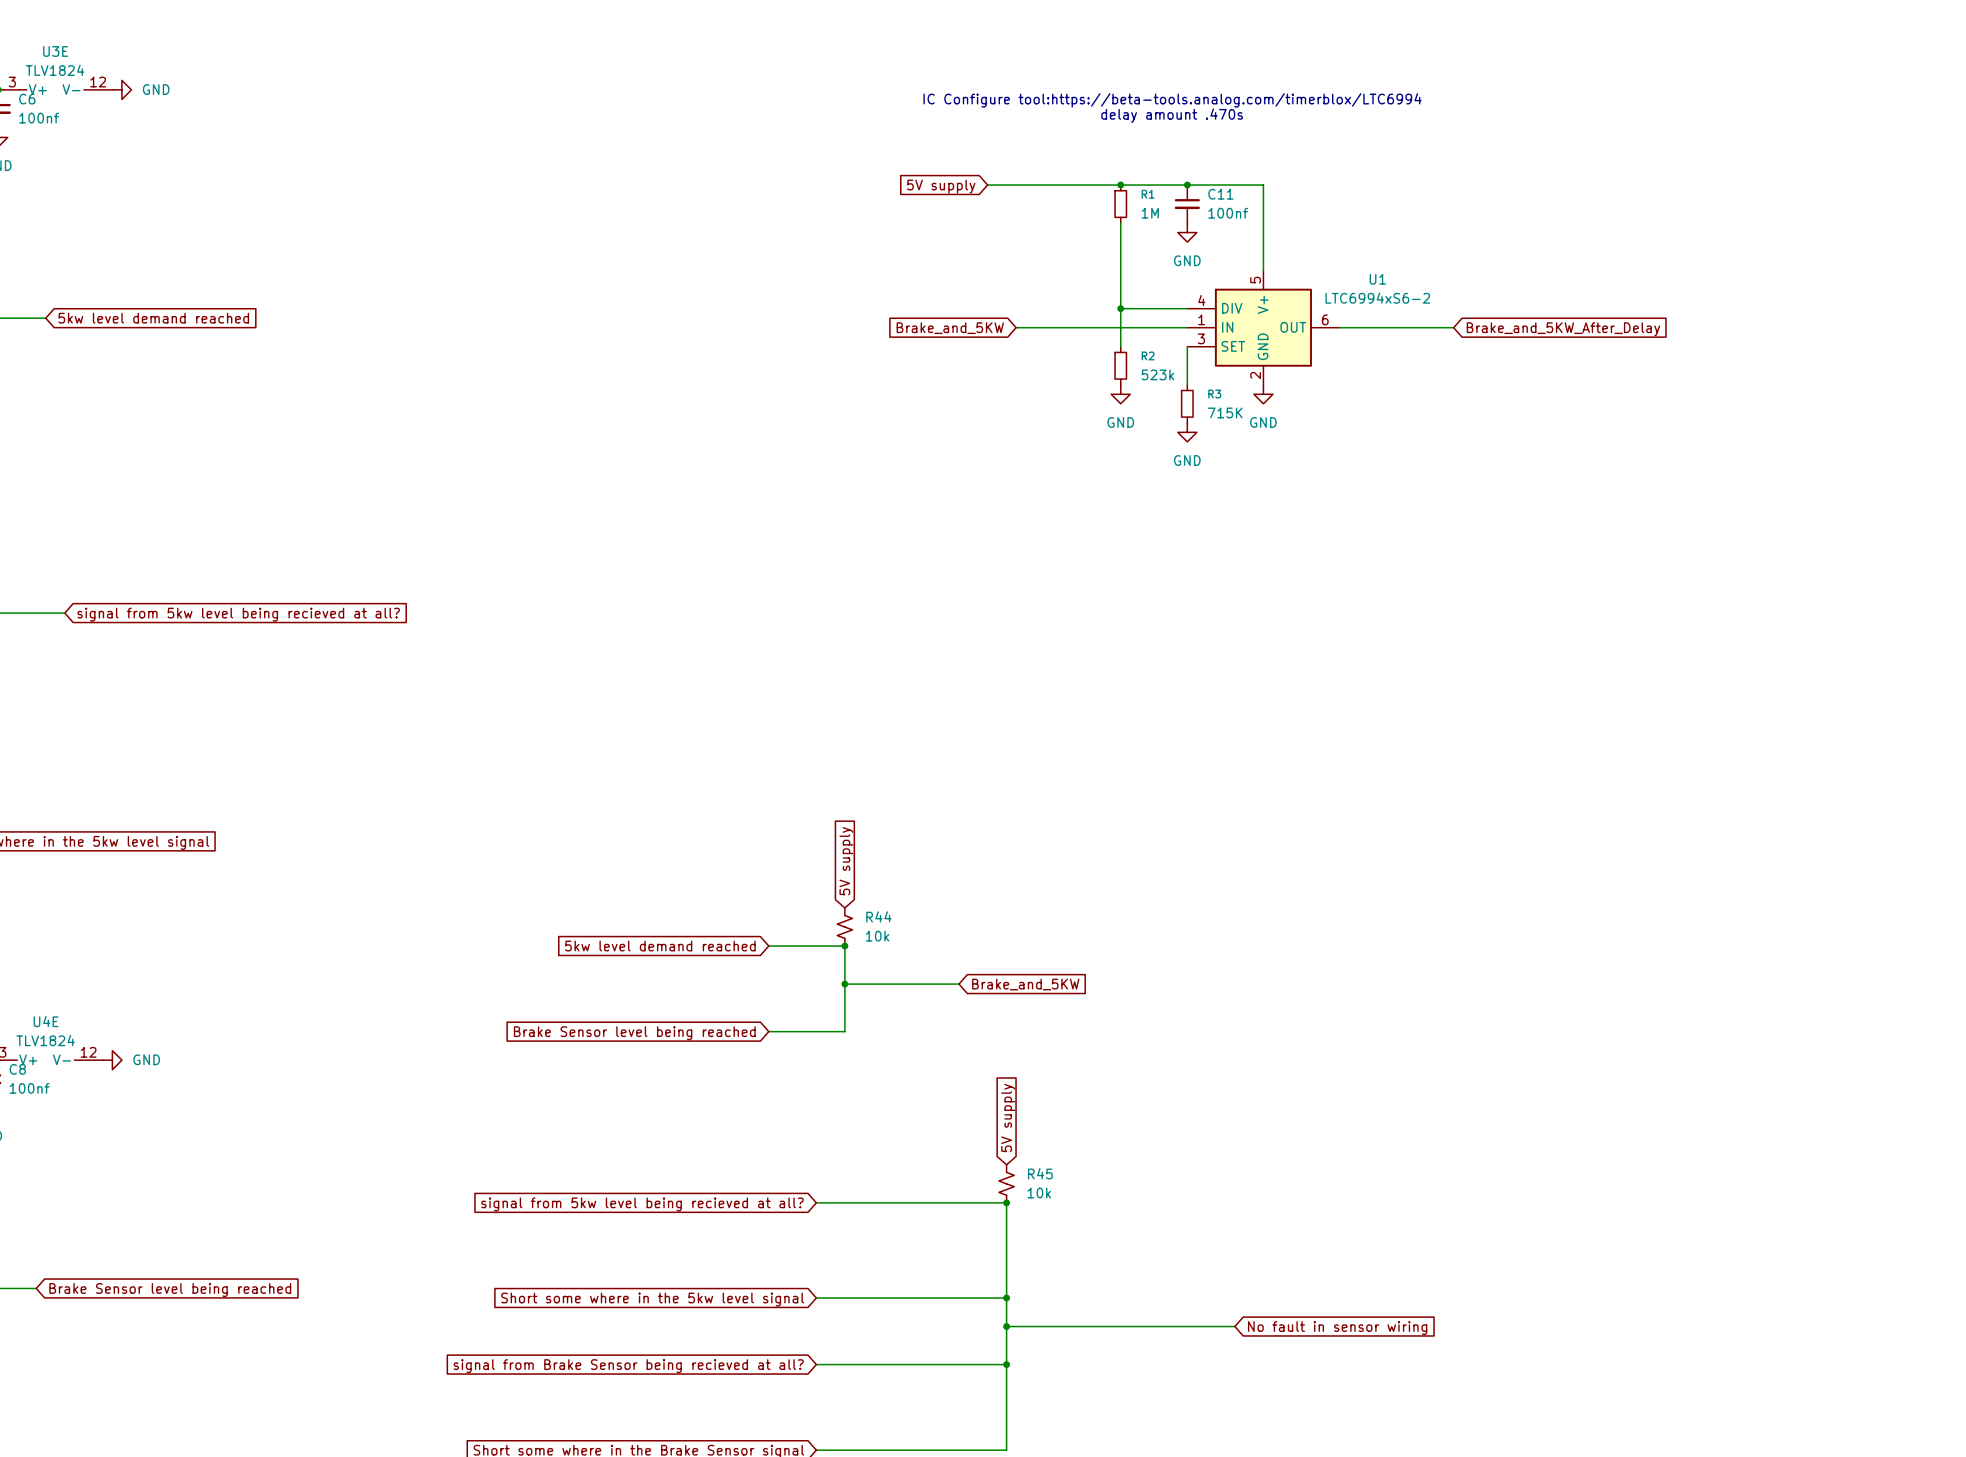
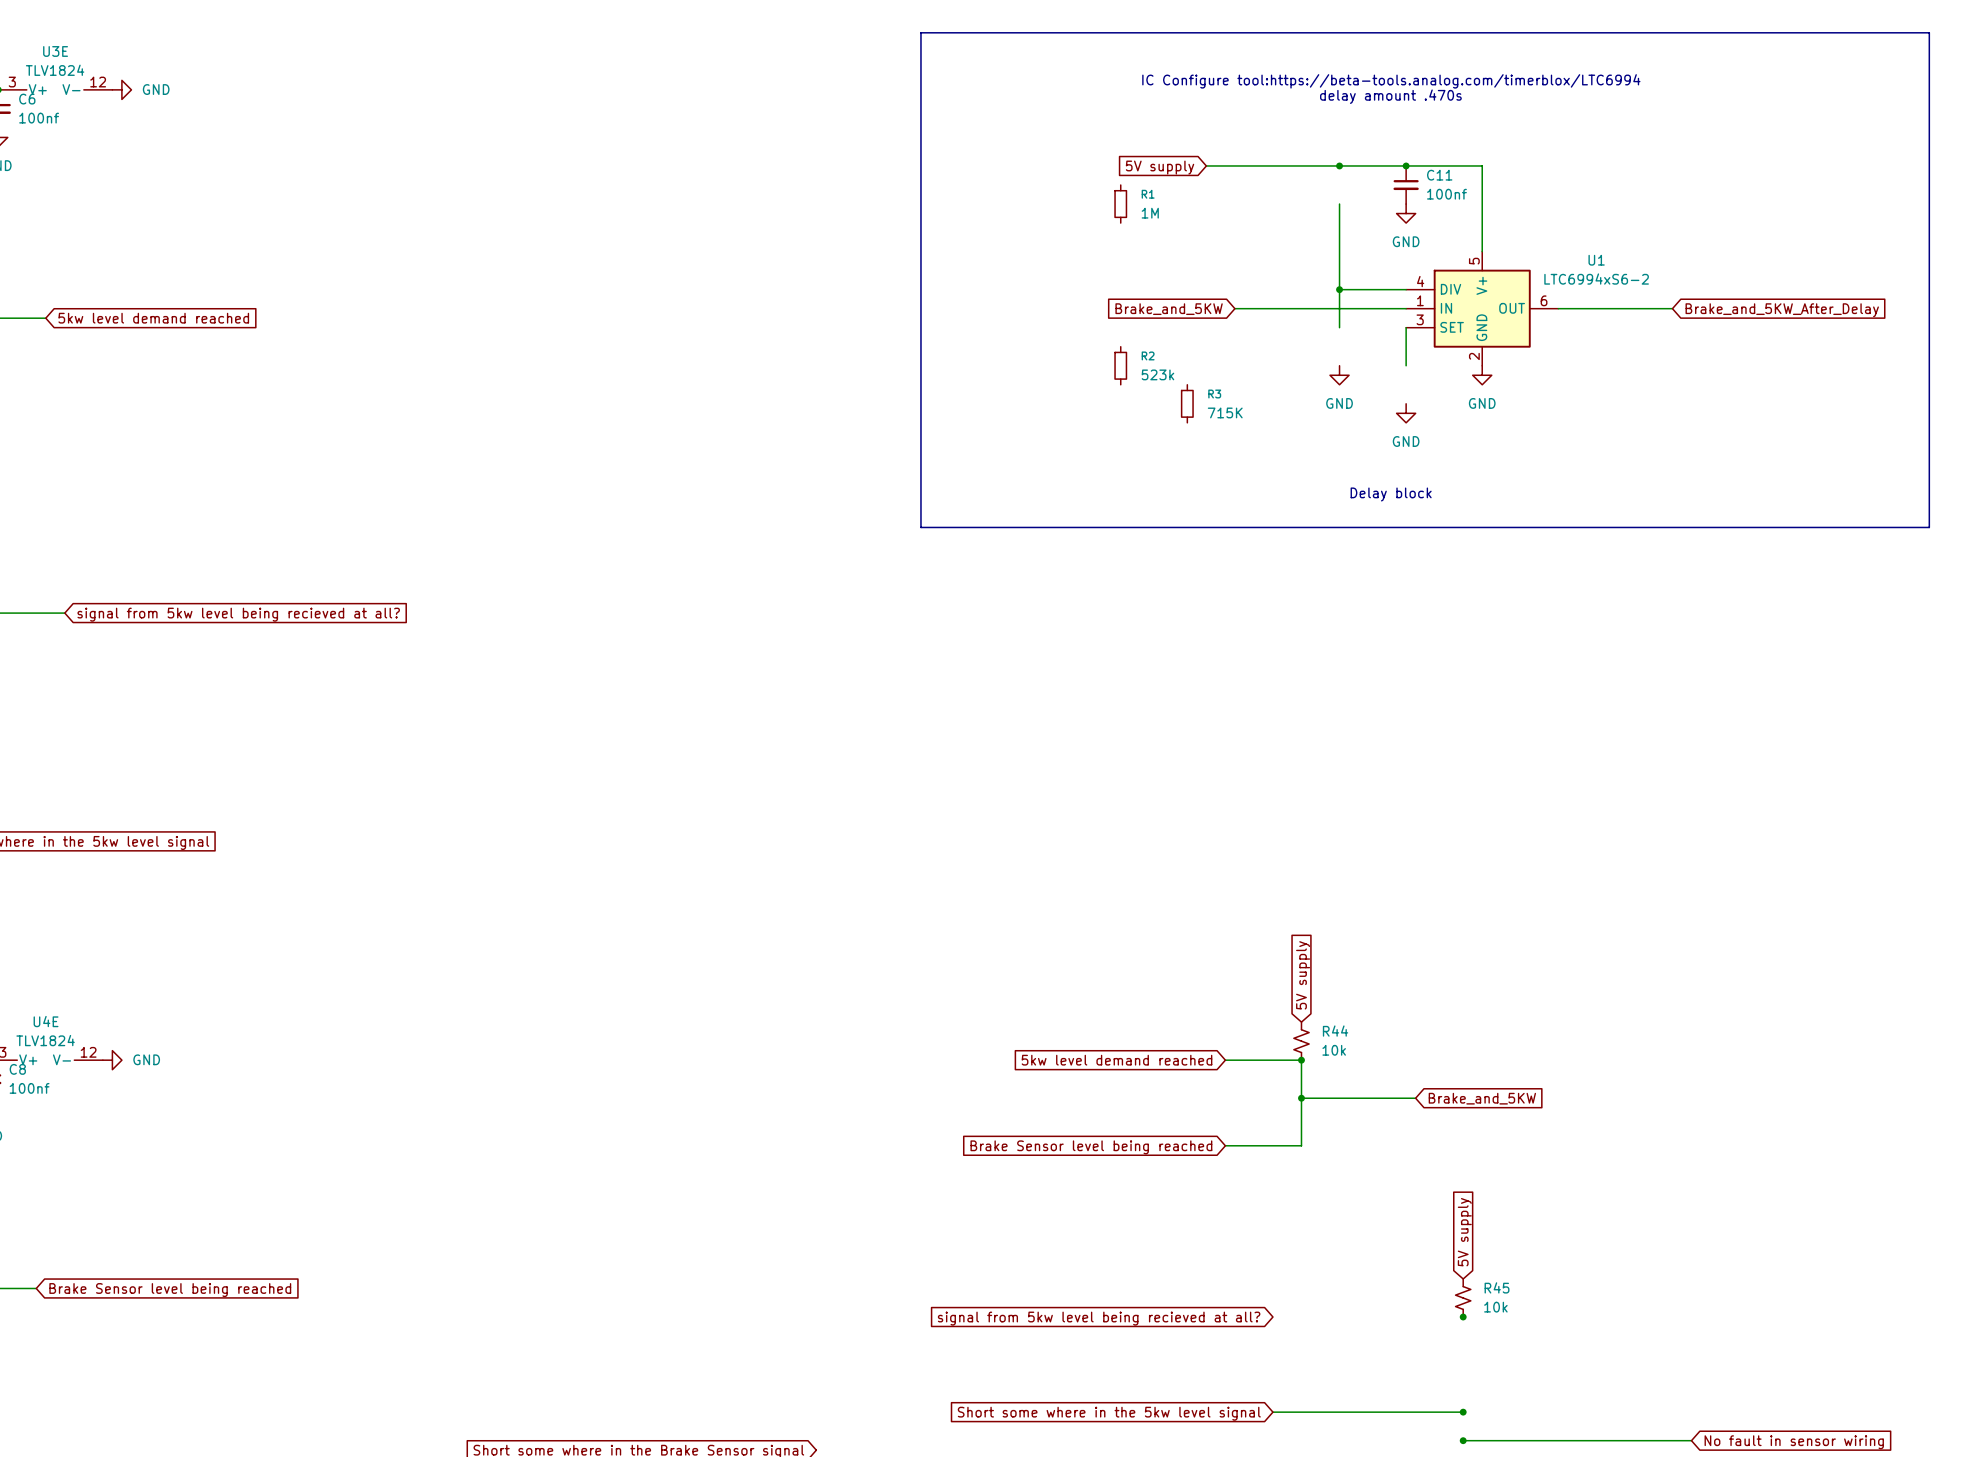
line: none -> (920, 32) (1929, 32) (1929, 527) (920, 527) (920, 32)
text: none -> IC Configure tool:https://beta-tools.analog.com/timerblox/LTC6994 (1391, 81)
text: none -> delay amount .470s (1390, 96)
text: IC Configure tool:https://beta-tools.analog.com/timerblox/LTC6994 (1172, 100) -> none
text: delay amount .470s (1172, 115) -> none
wire: none -> (1206, 165) (1482, 165) (1482, 251)
junction: none -> (1339, 165)
junction: none -> (1406, 165)
global label: none -> 5V supply (1160, 167)
wire: (987, 185) (1263, 185) (1263, 270) -> none
junction: (1120, 185) -> none
junction: (1187, 185) -> none
global label: 5V supply (941, 186) -> none
C11 position: (1187, 204) -> (1406, 185)
power symbol: none -> GND (1406, 213)
wire: (1120, 223) (1120, 346) -> none
power symbol: GND (1187, 232) -> none
wire: none -> (1339, 289) (1406, 289)
junction: none -> (1339, 289)
wire: (1120, 308) (1187, 308) -> none
junction: (1120, 308) -> none
wire: none -> (1234, 308) (1406, 308)
wire: none -> (1558, 308) (1672, 308)
global label: none -> Brake_and_5KW (1169, 309)
global label: none -> Brake_and_5KW_After_Delay (1782, 310)
wire: (1016, 327) (1187, 327) -> none
U1 position: (1263, 327) -> (1482, 308)
wire: (1339, 327) (1453, 327) -> (1339, 327) (1339, 204)
wire: none -> (1406, 327) (1406, 365)
global label: Brake_and_5KW (950, 328) -> none
global label: Brake_and_5KW_After_Delay (1563, 329) -> none
wire: (1187, 346) (1187, 384) -> none
power symbol: none -> GND (1339, 375)
power symbol: none -> GND (1482, 375)
power symbol: GND (1120, 394) -> none
power symbol: GND (1263, 394) -> none
power symbol: none -> GND (1406, 413)
power symbol: GND (1187, 432) -> none
text: none -> Delay block (1391, 494)
global label: 5V supply (846, 861) -> none
R44 position: (844, 927) -> (1301, 1041)
global label: 5kw level demand reached (660, 946) -> none
wire: (768, 946) (844, 946) (844, 1031) (768, 1031) -> none
junction: (844, 946) -> none
global label: none -> 5V supply (1303, 975)
wire: (844, 984) (959, 984) -> none
junction: (844, 984) -> none
global label: Brake_and_5KW (1025, 984) -> none
global label: Brake Sensor level being reached (634, 1033) -> none
global label: none -> 5kw level demand reached (1116, 1060)
wire: none -> (1225, 1060) (1301, 1060) (1301, 1145) (1225, 1145)
junction: none -> (1301, 1060)
wire: none -> (1301, 1098) (1415, 1098)
junction: none -> (1301, 1098)
global label: none -> Brake_and_5KW (1482, 1098)
global label: 5V supply (1008, 1118) -> none
global label: none -> Brake Sensor level being reached (1091, 1147)
R45 position: (1006, 1183) -> (1463, 1297)
wire: (816, 1202) (1006, 1202) (1006, 1450) (816, 1450) -> none
junction: (1006, 1202) -> none
global label: signal from 5kw level being recieved at all? (642, 1204) -> none
global label: none -> 5V supply (1464, 1232)
wire: (816, 1297) (1006, 1297) -> none
junction: (1006, 1297) -> none
global label: Short some where in the 5kw level signal (652, 1299) -> none
junction: none -> (1463, 1317)
global label: none -> signal from 5kw level being recieved at all? (1099, 1318)
junction: (1006, 1326) -> none
global label: No fault in sensor wiring (1337, 1328) -> none
wire: (816, 1364) (1006, 1364) -> none
junction: (1006, 1364) -> none
global label: signal from Brake Sensor being recieved at all? (628, 1366) -> none
wire: none -> (1272, 1412) (1463, 1412)
junction: none -> (1463, 1412)
global label: none -> Short some where in the 5kw level signal (1109, 1413)
wire: none -> (1463, 1440) (1691, 1440)
junction: none -> (1463, 1440)
global label: none -> No fault in sensor wiring (1794, 1442)

